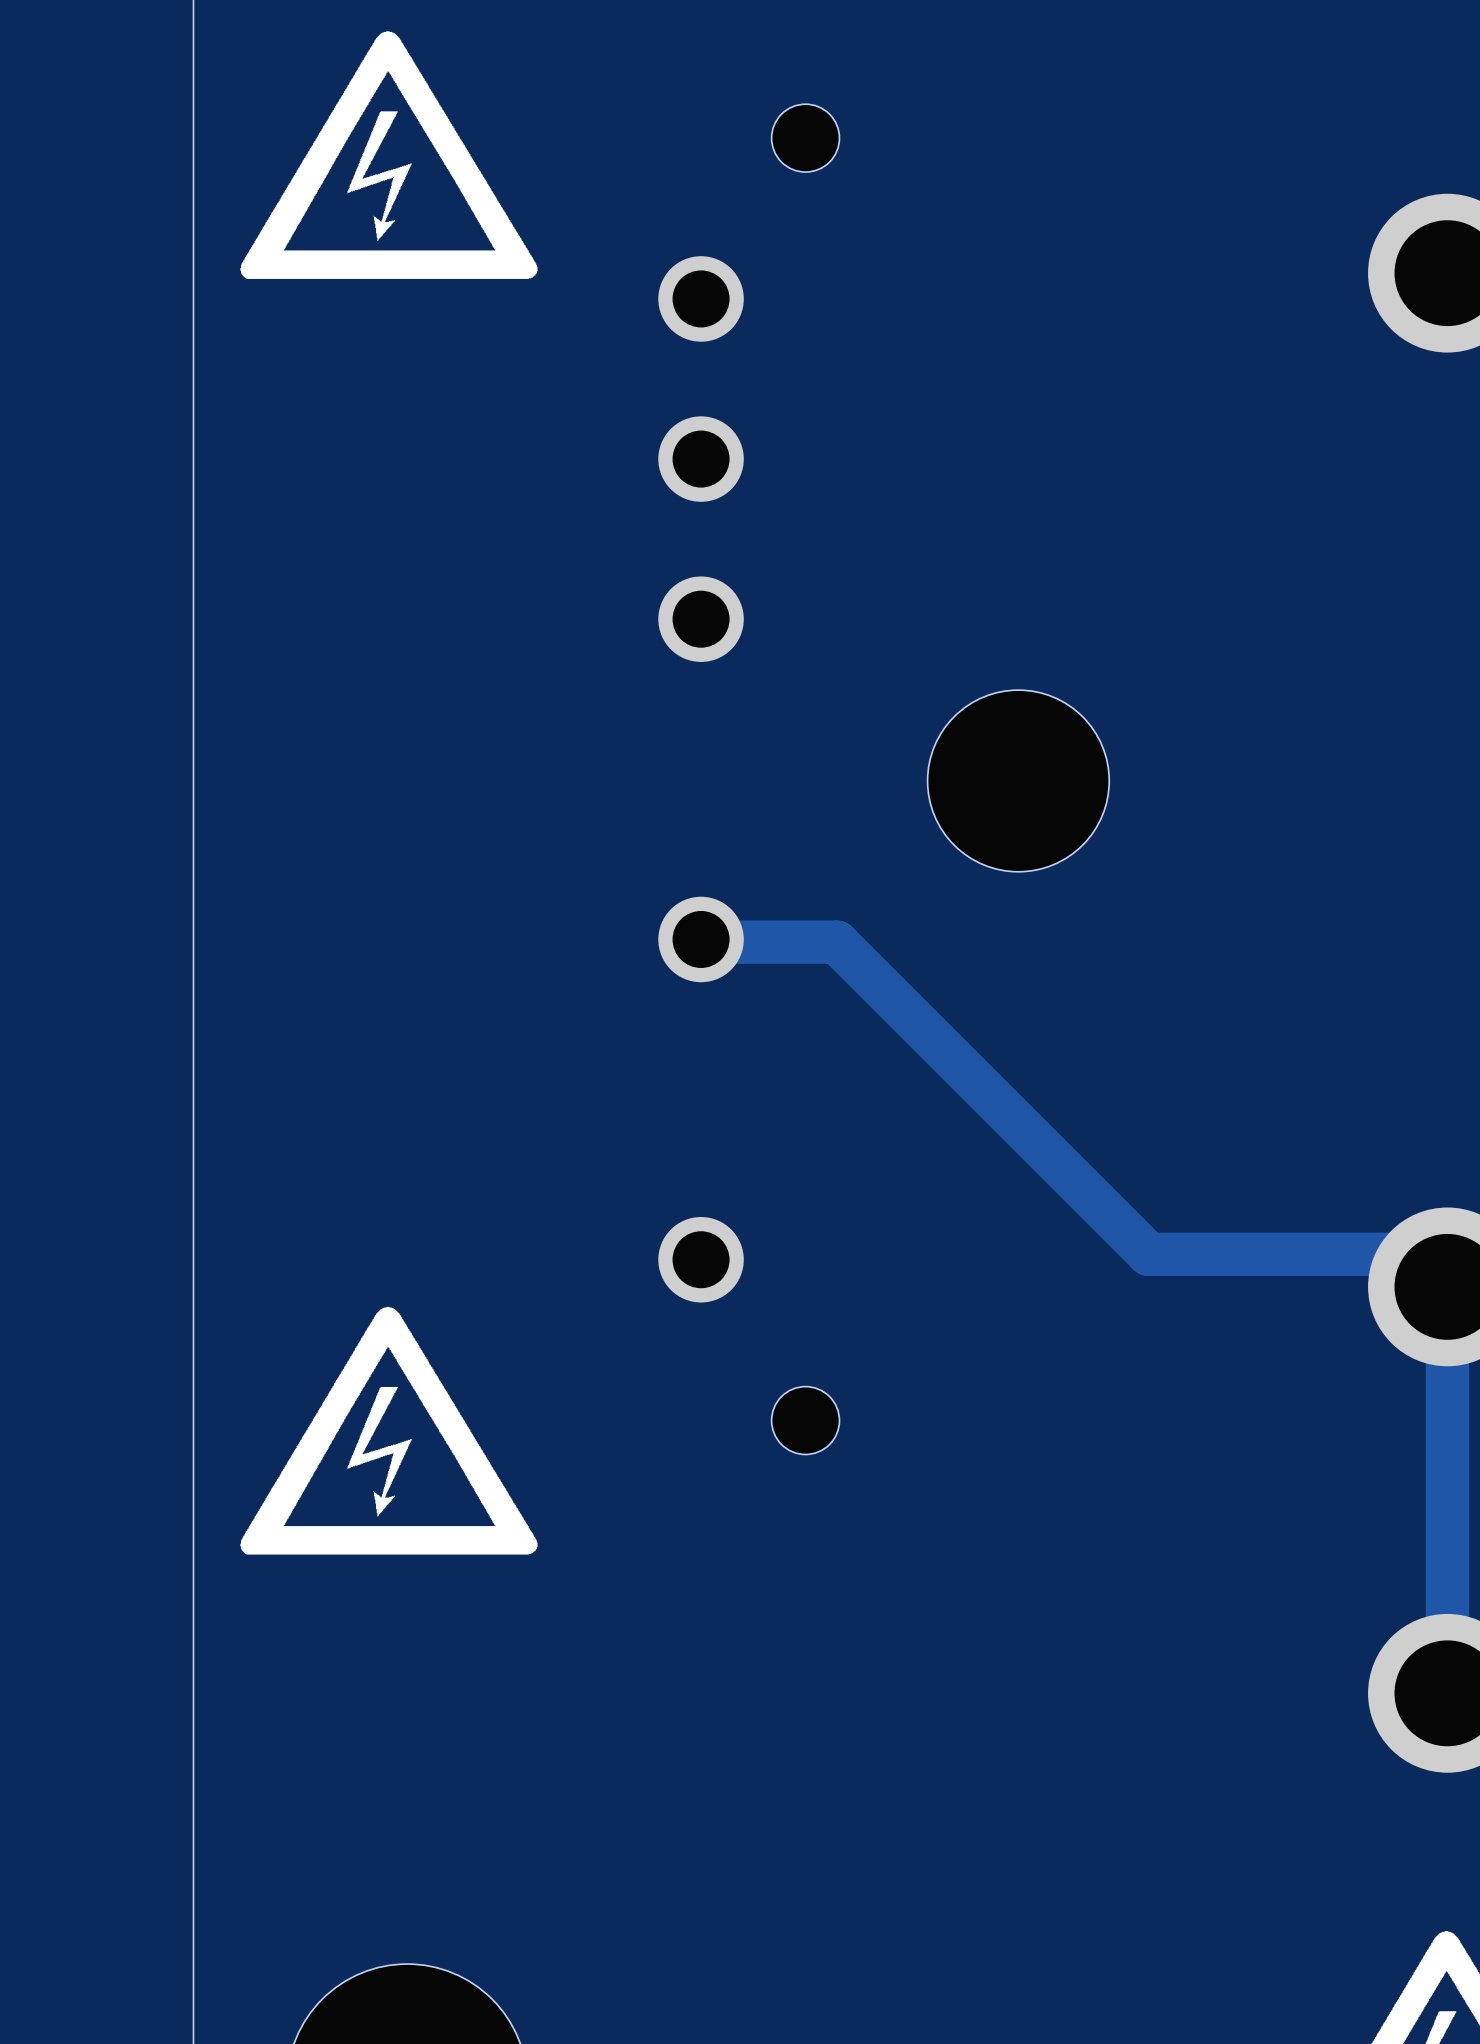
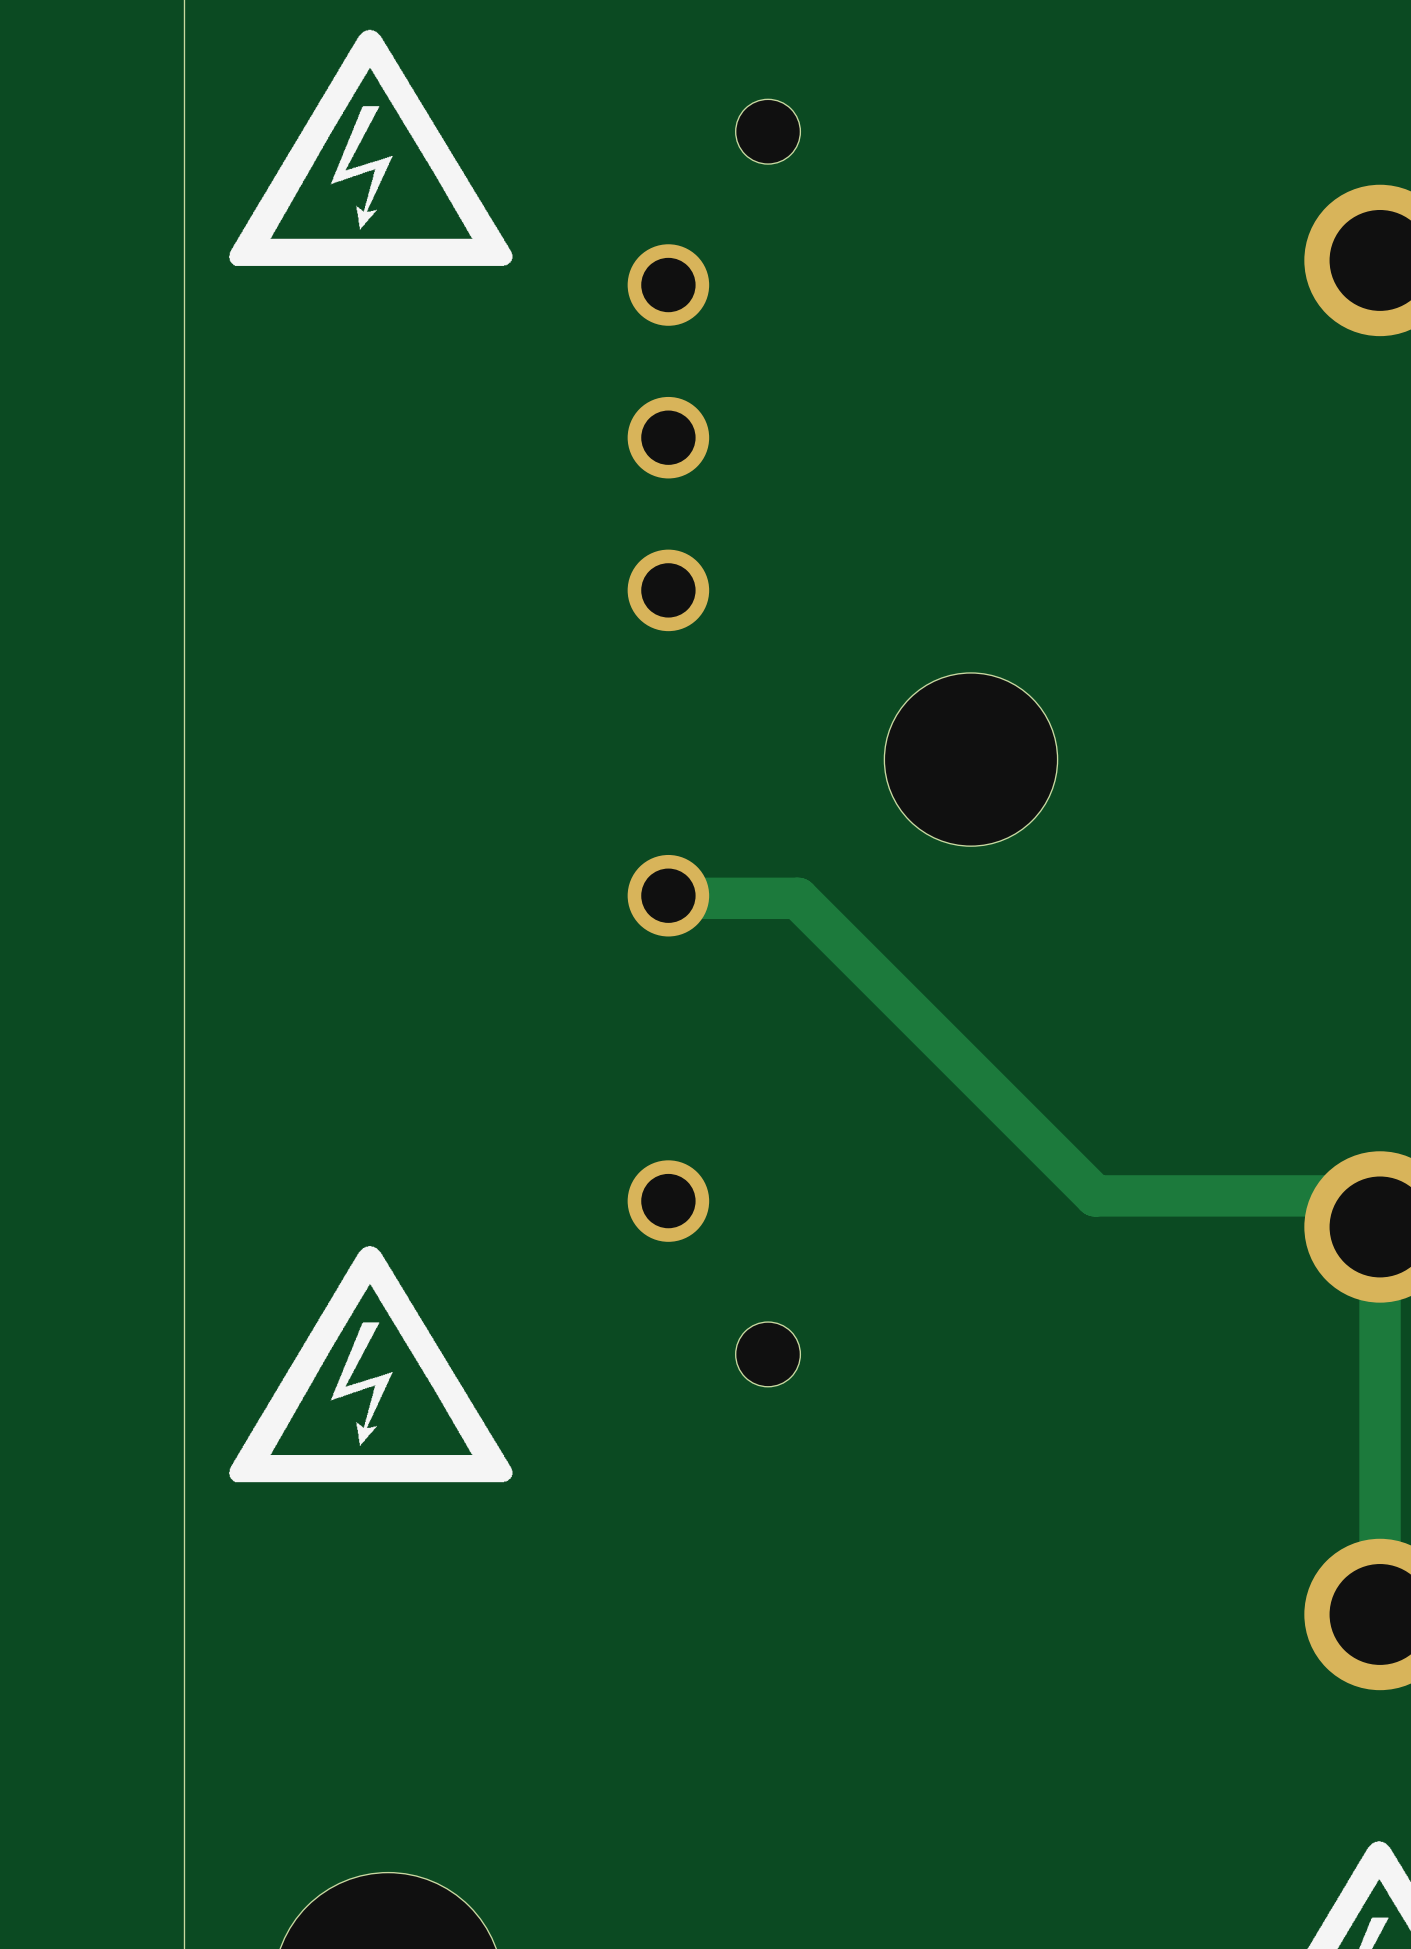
part position: (1018, 780) -> (970, 759)

